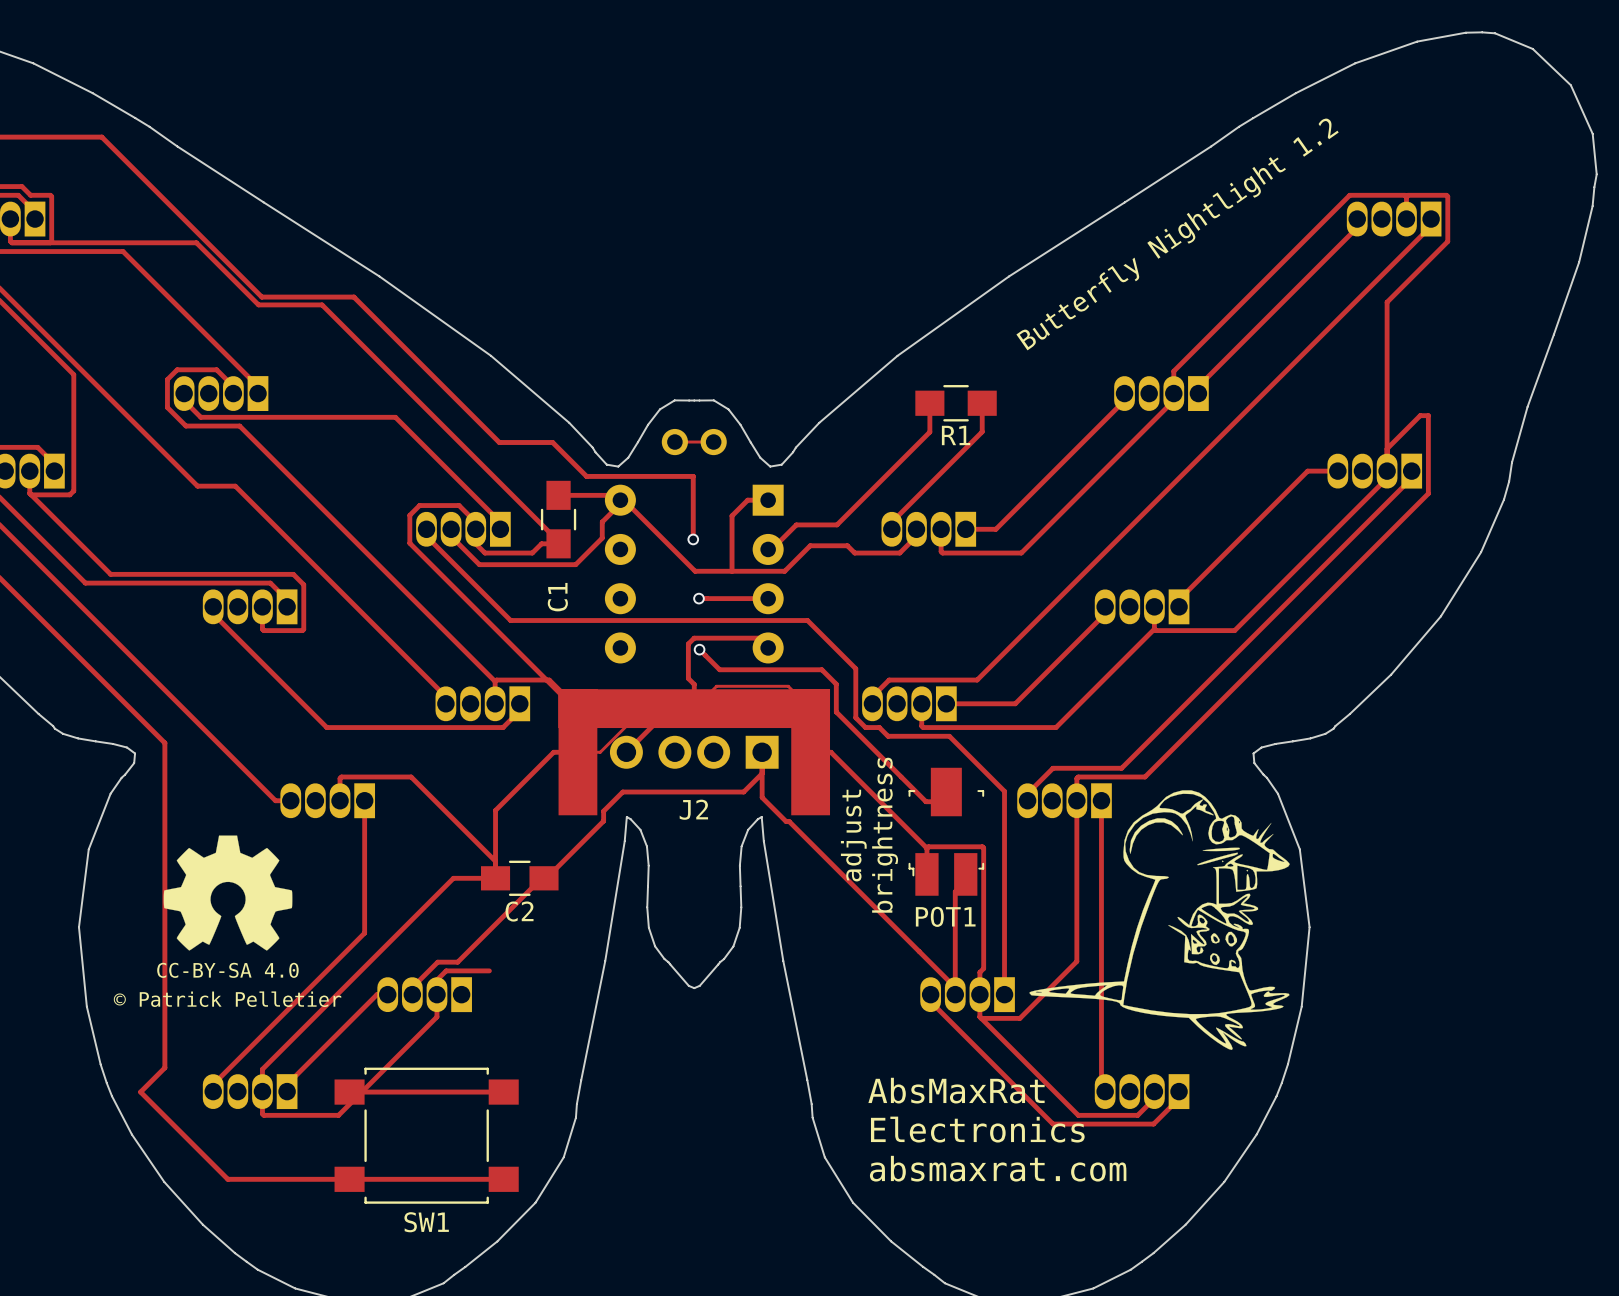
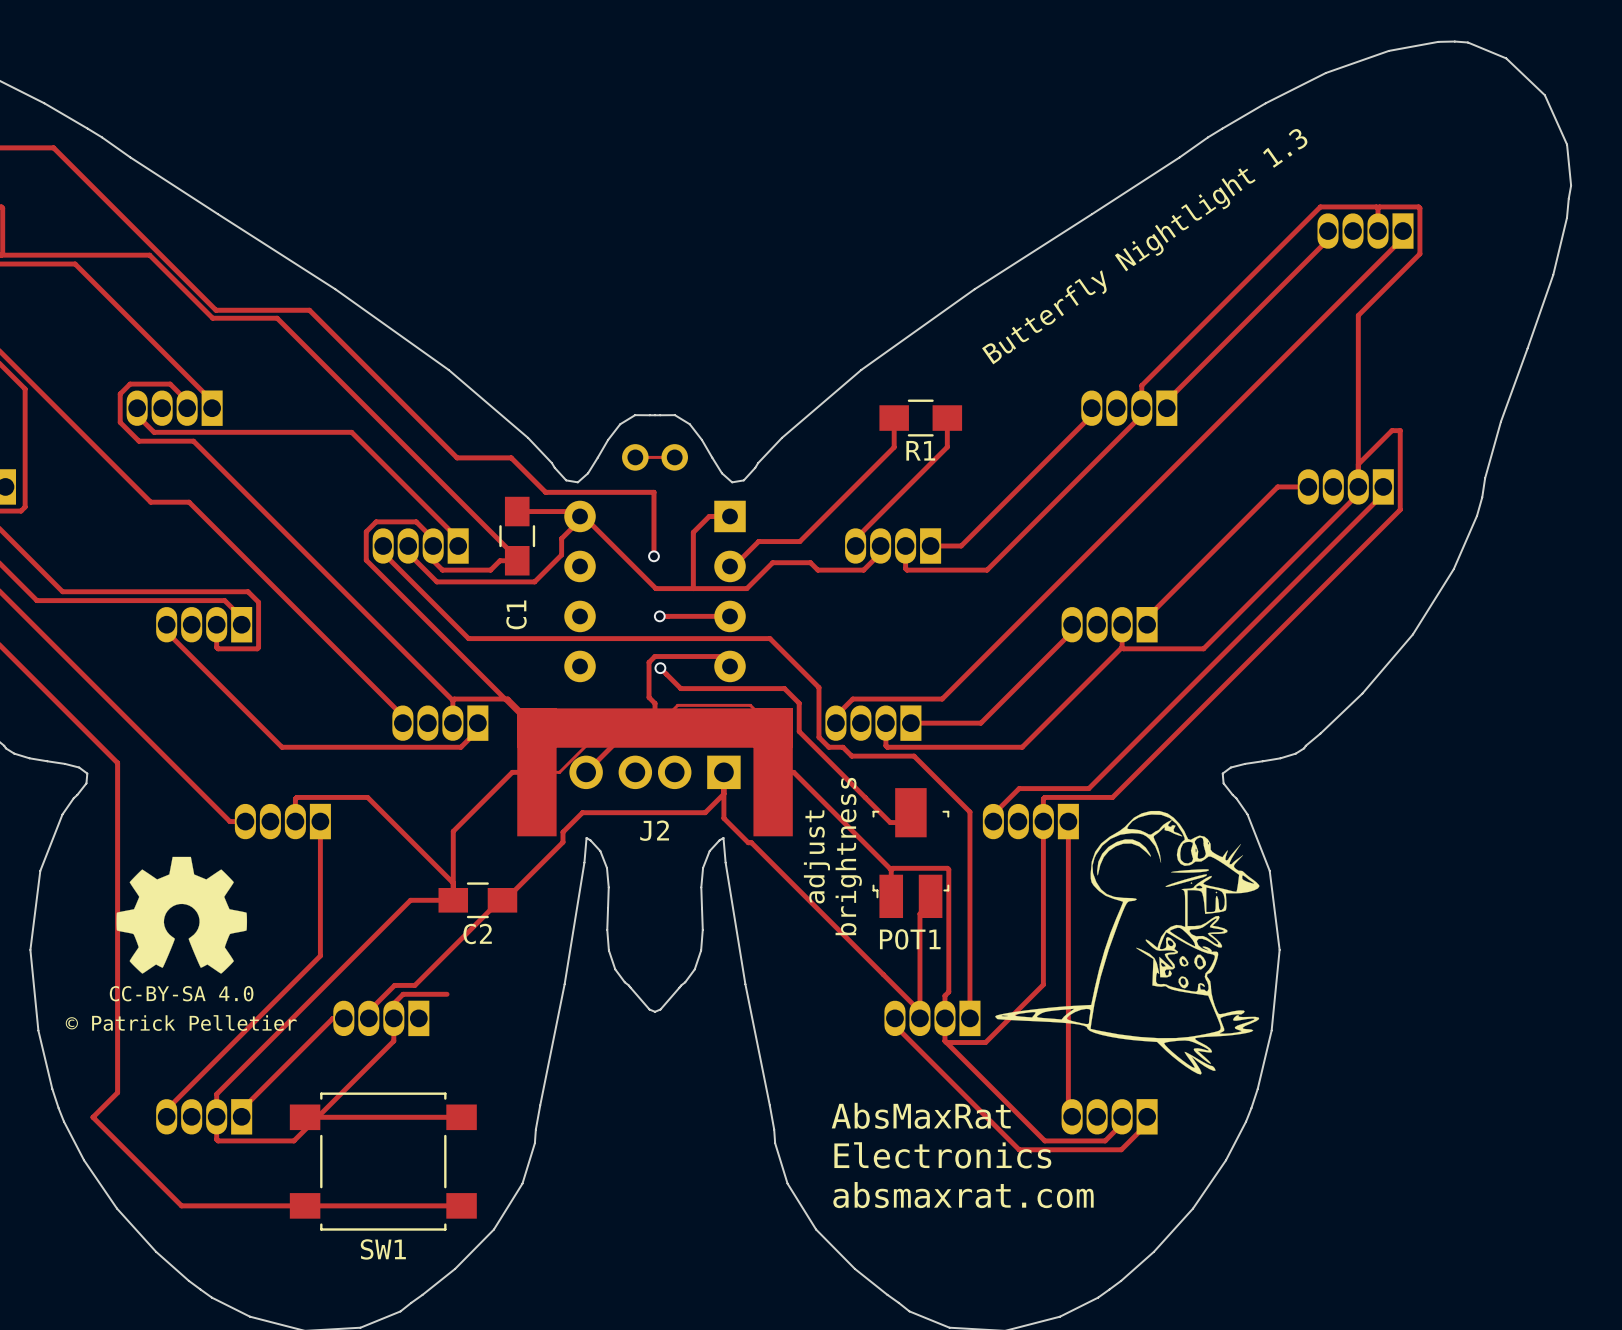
text: Butterfly Nightlight 1.2 (1177, 234) -> Butterfly Nightlight 1.3 (1144, 246)

